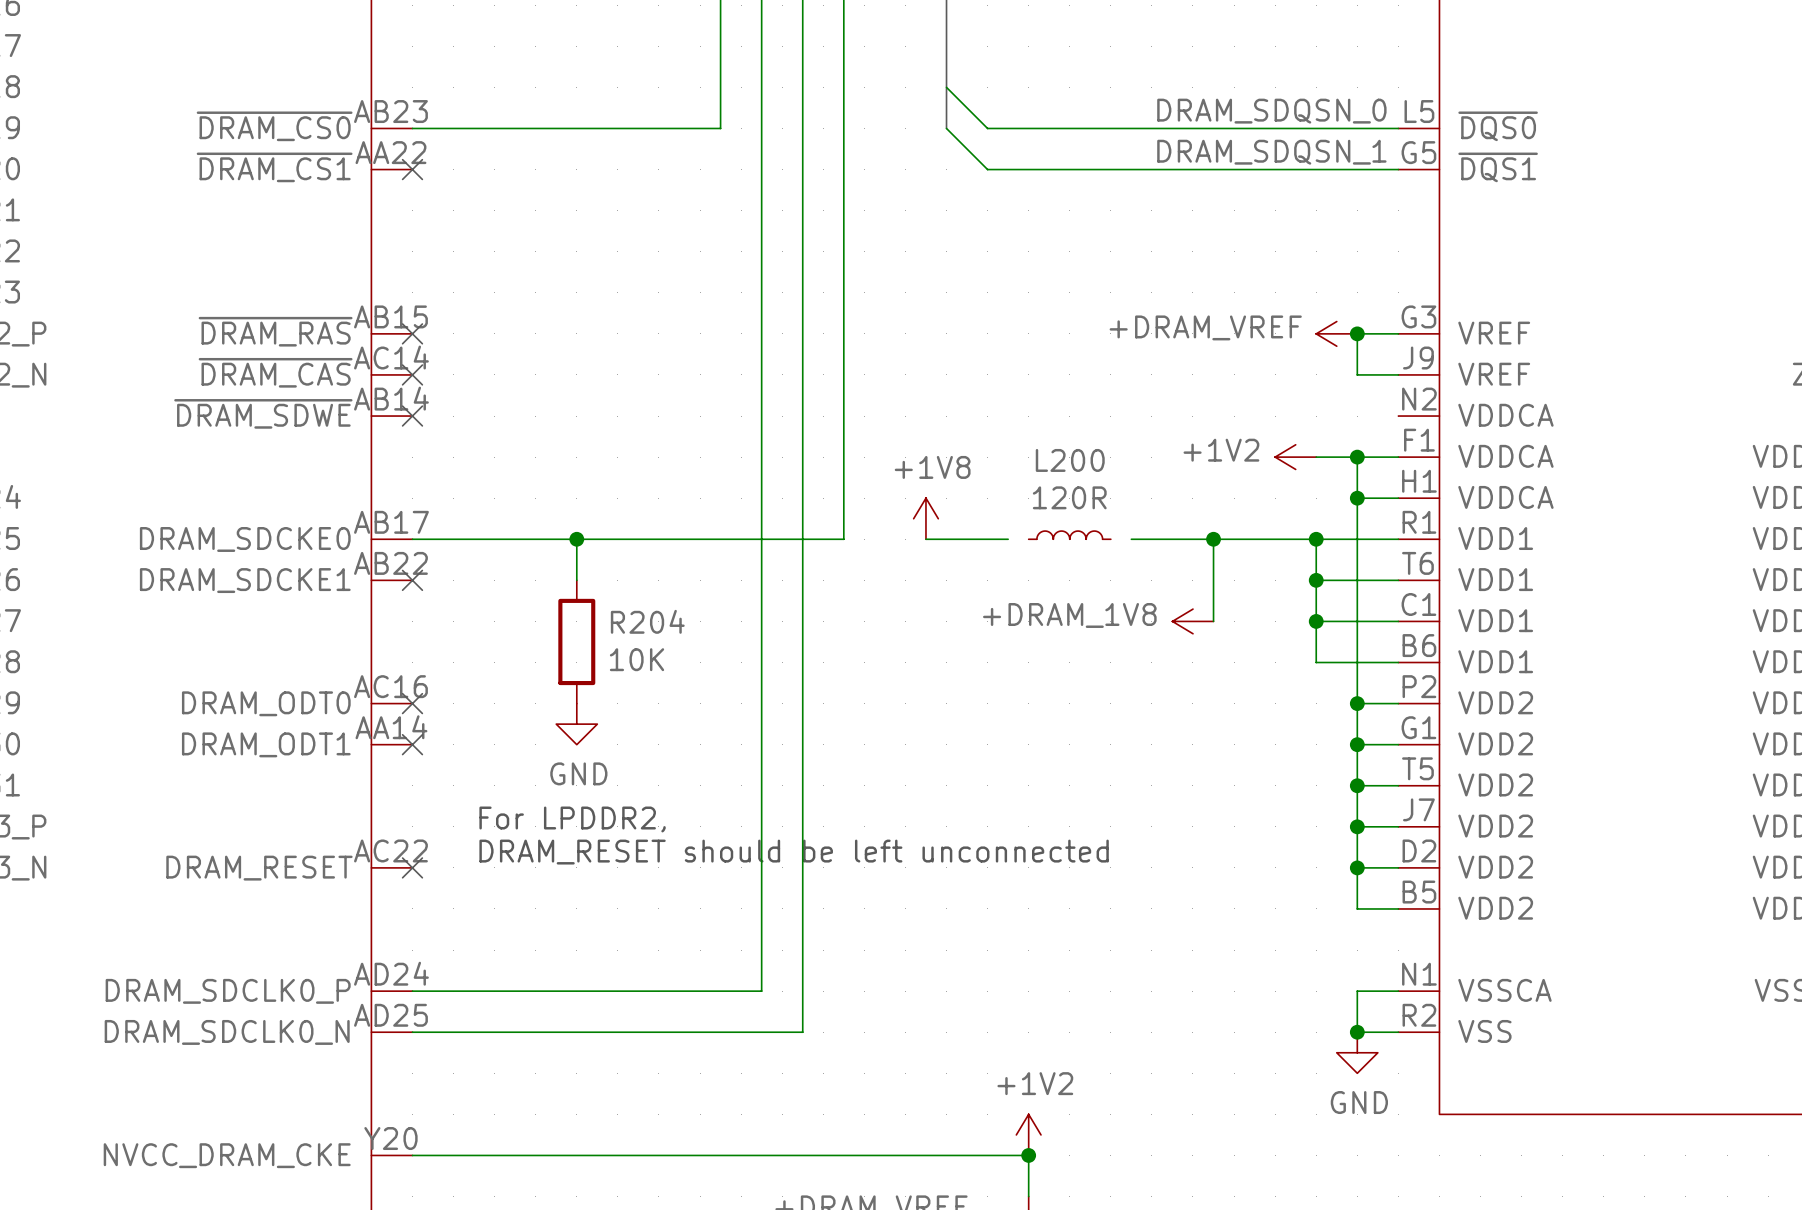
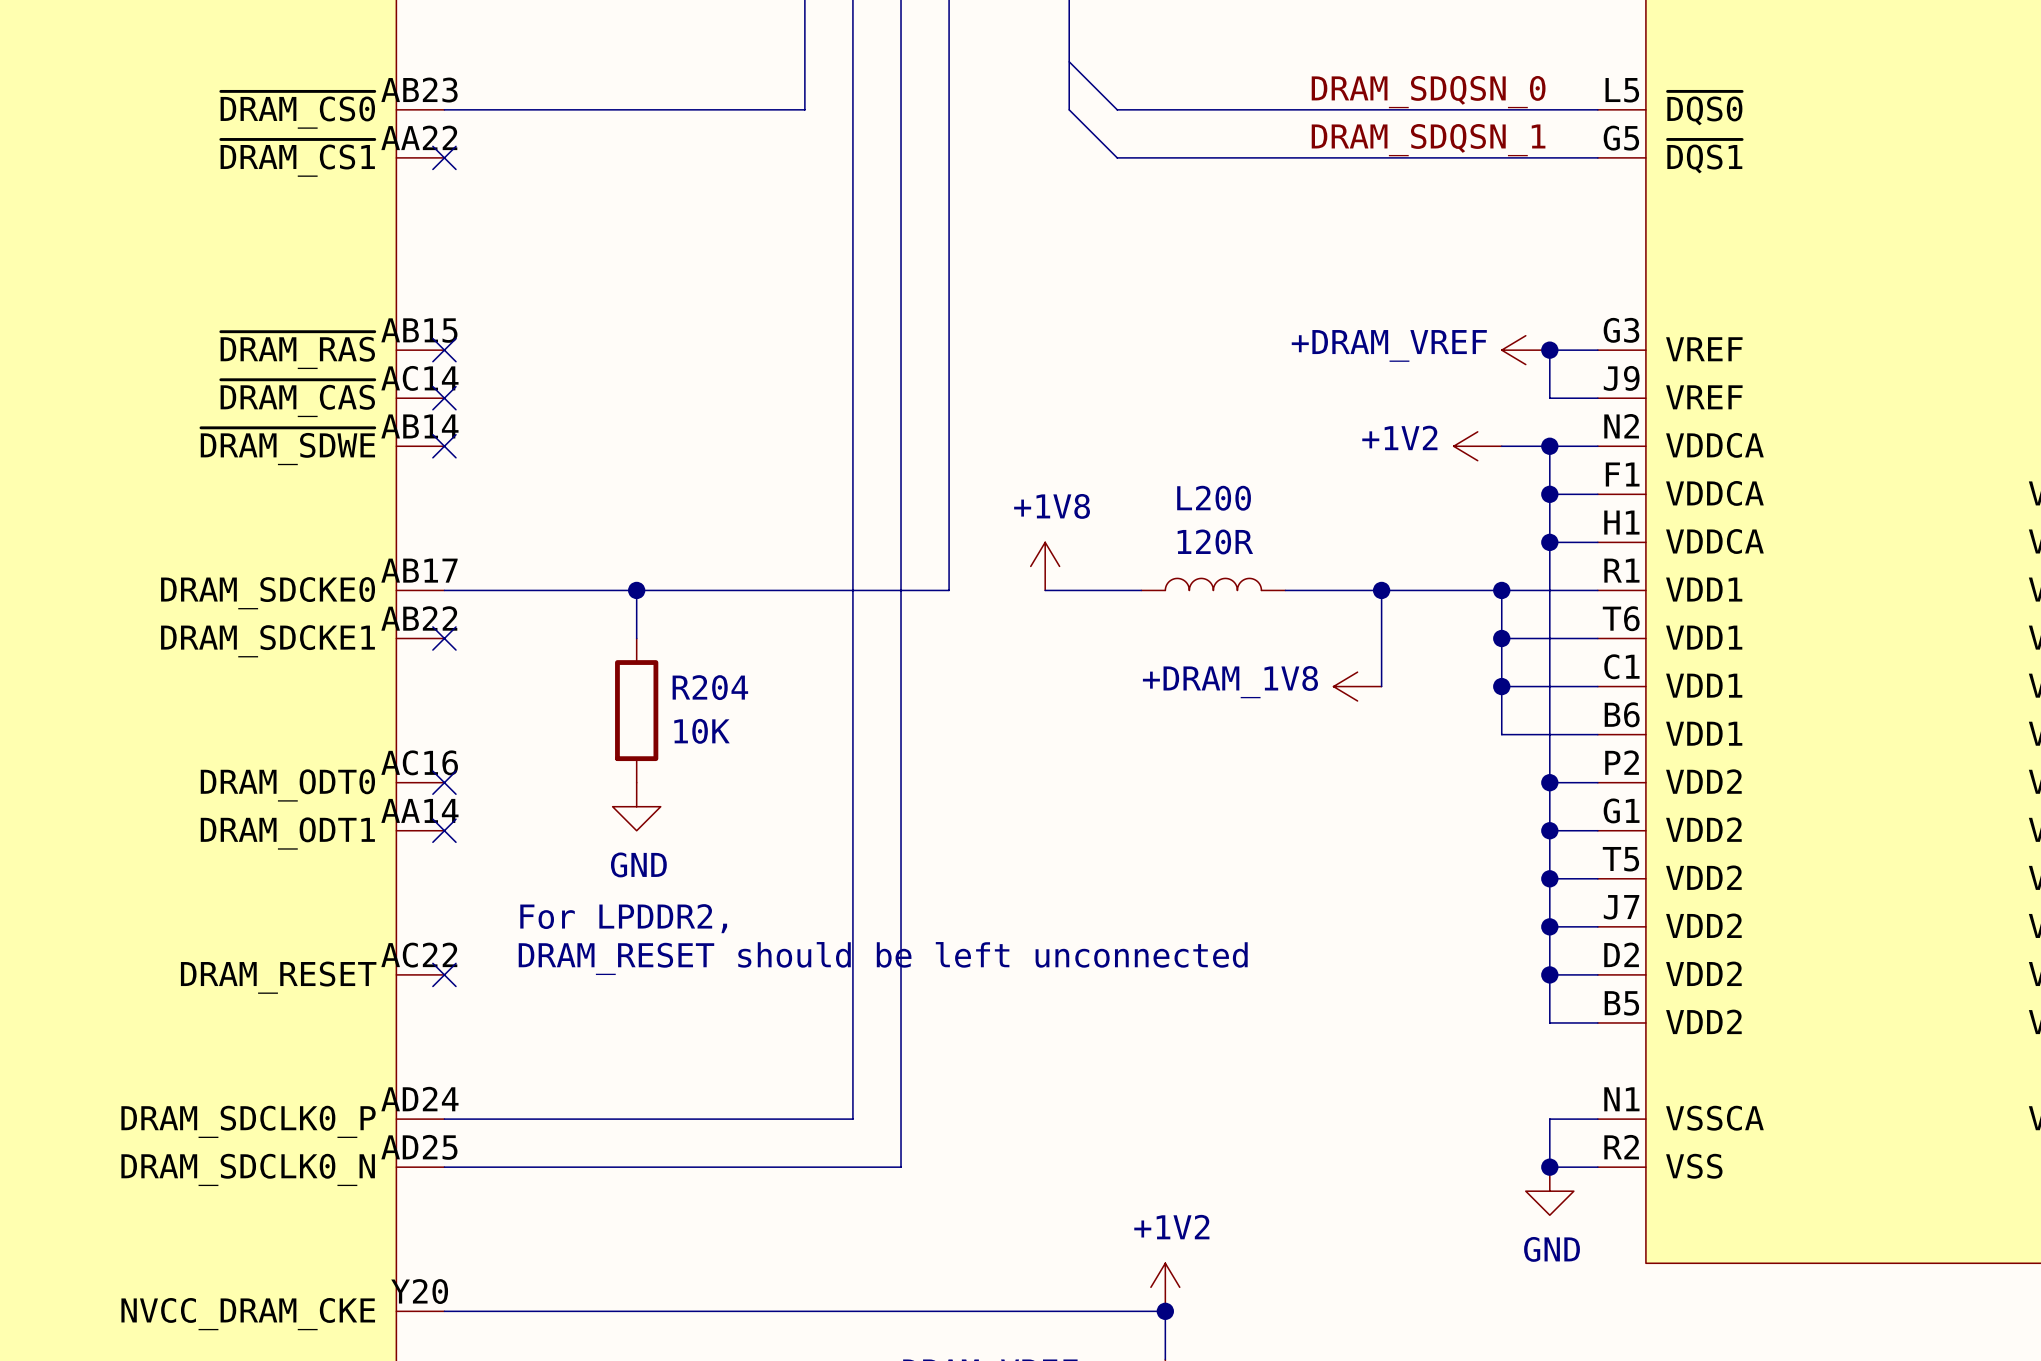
wire: none -> (1501, 446) (1597, 446)
junction: none -> (1549, 446)
power symbol position: +1V2 (1295, 457) -> +1V2 (1477, 446)
wire: (1316, 457) (1357, 457) -> (1549, 446) (1549, 494)
L200 symbol: [1028, 531, 1111, 540] -> [1141, 578, 1286, 591]

